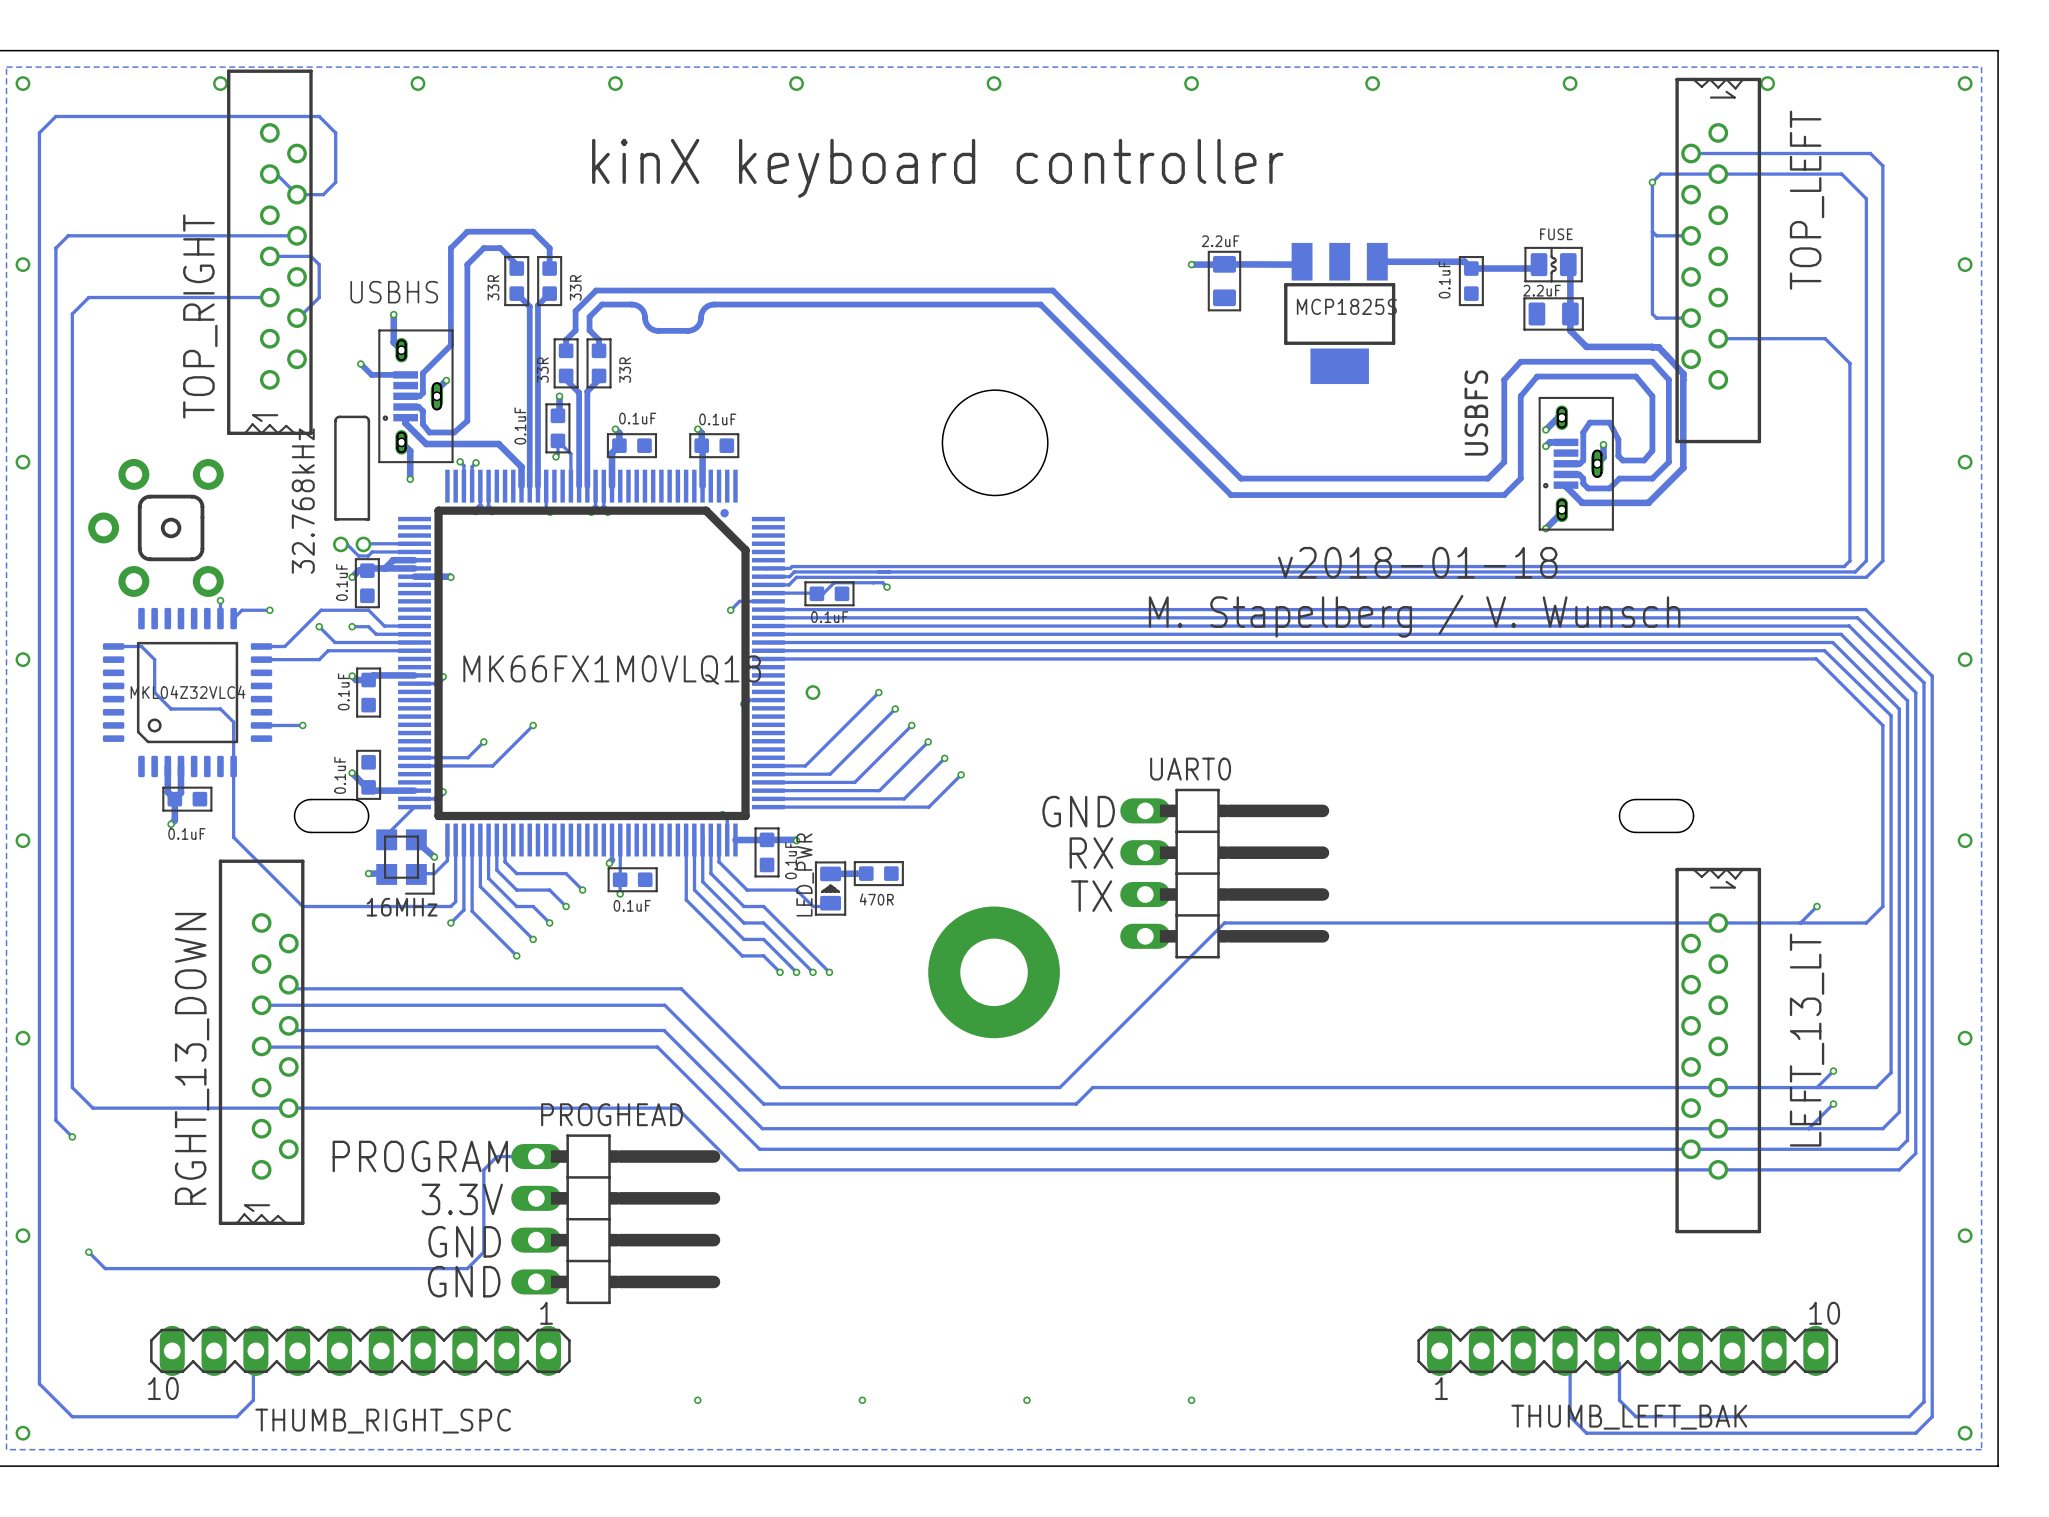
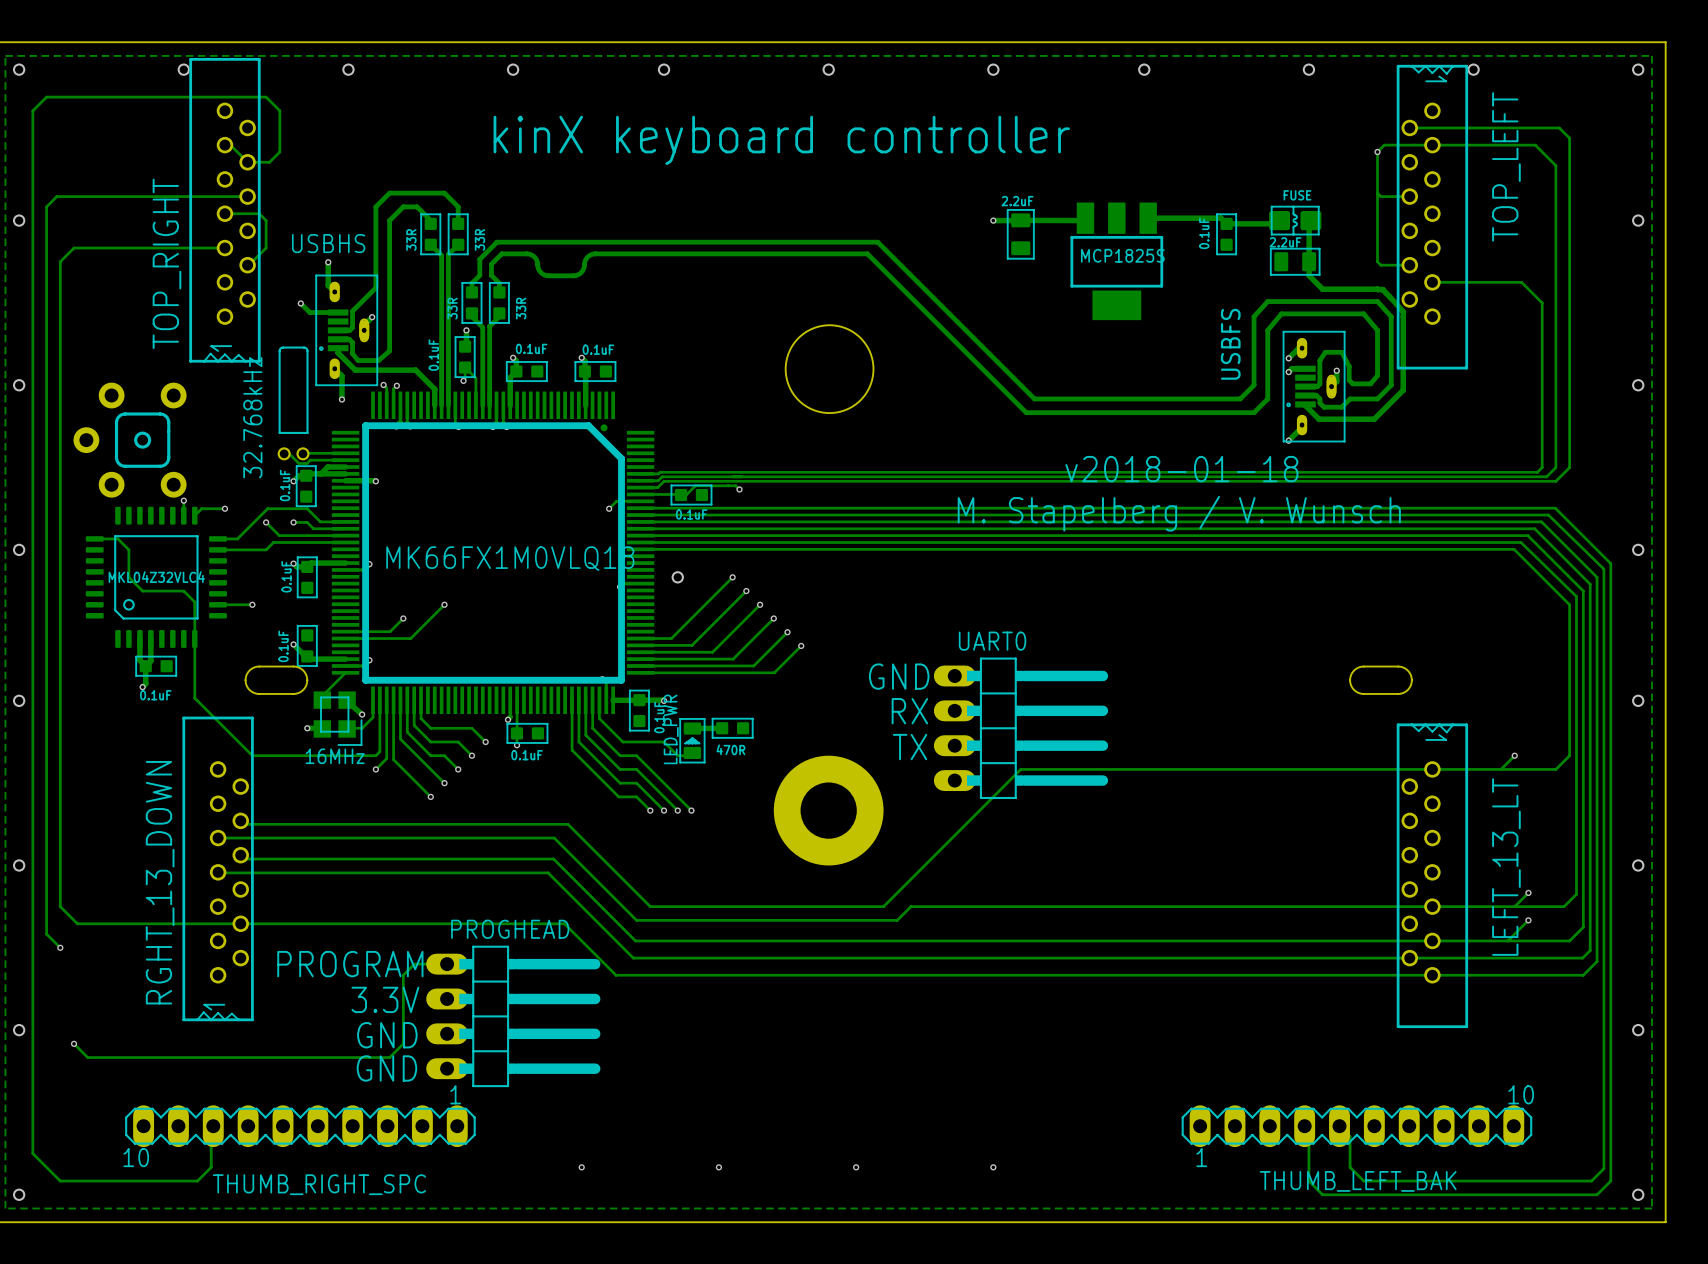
part footprint: [1524, 246, 1583, 283] -> [1269, 205, 1322, 236]

